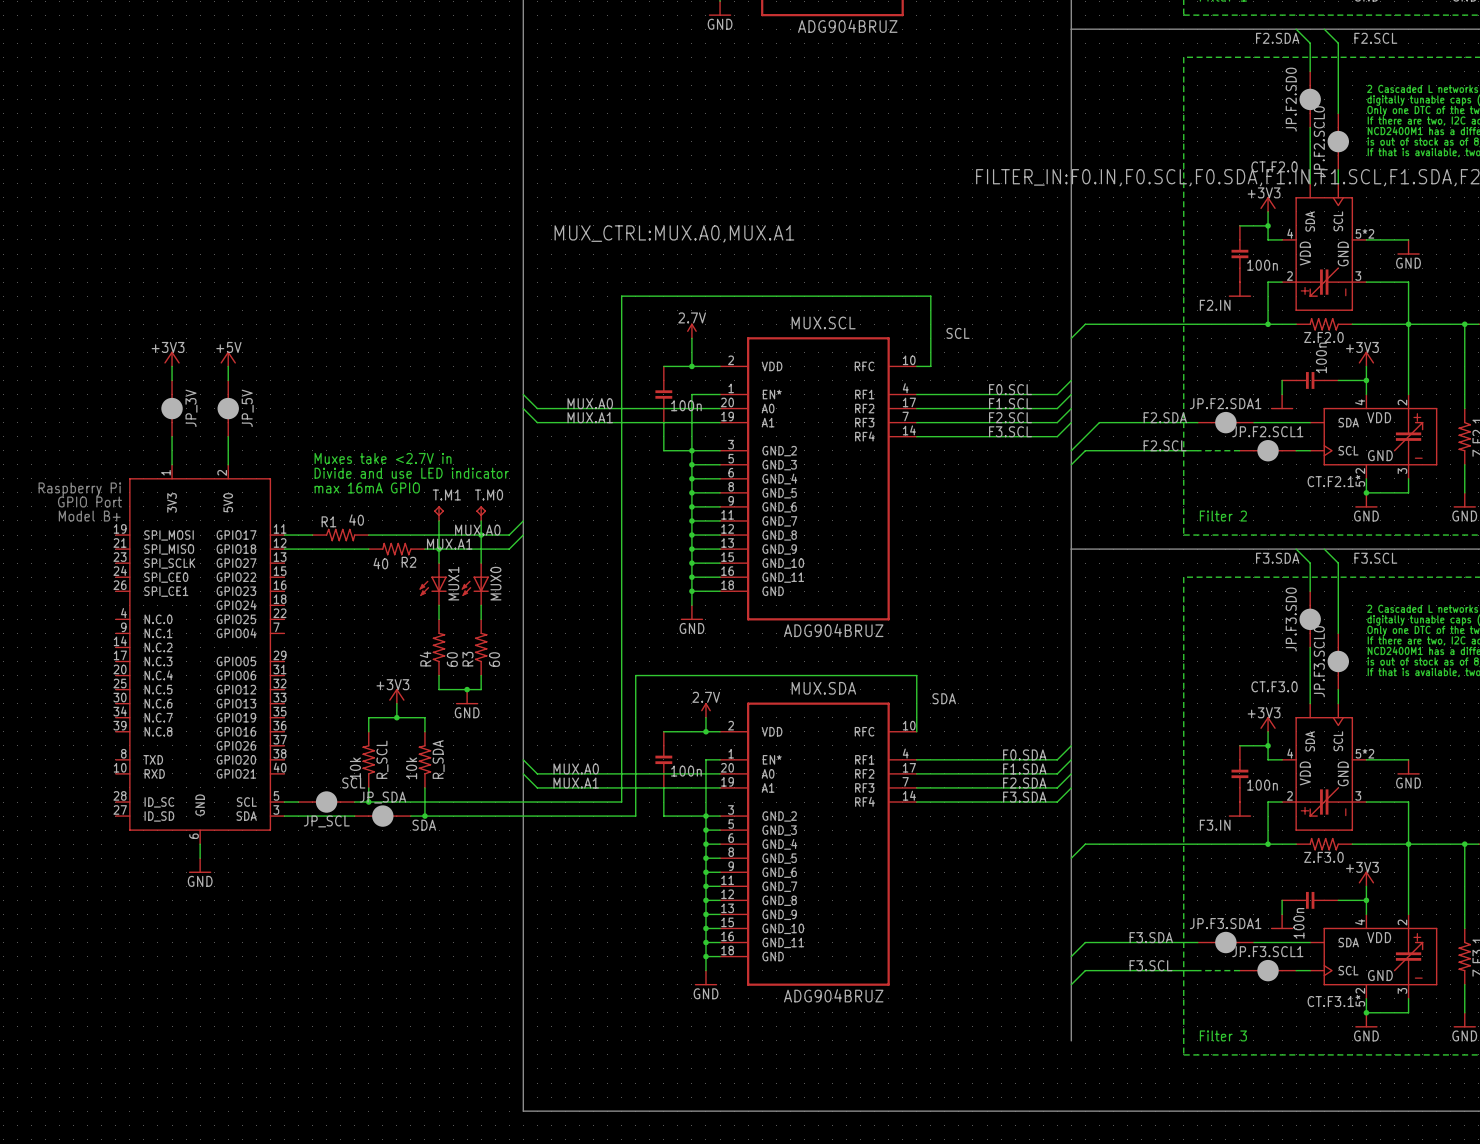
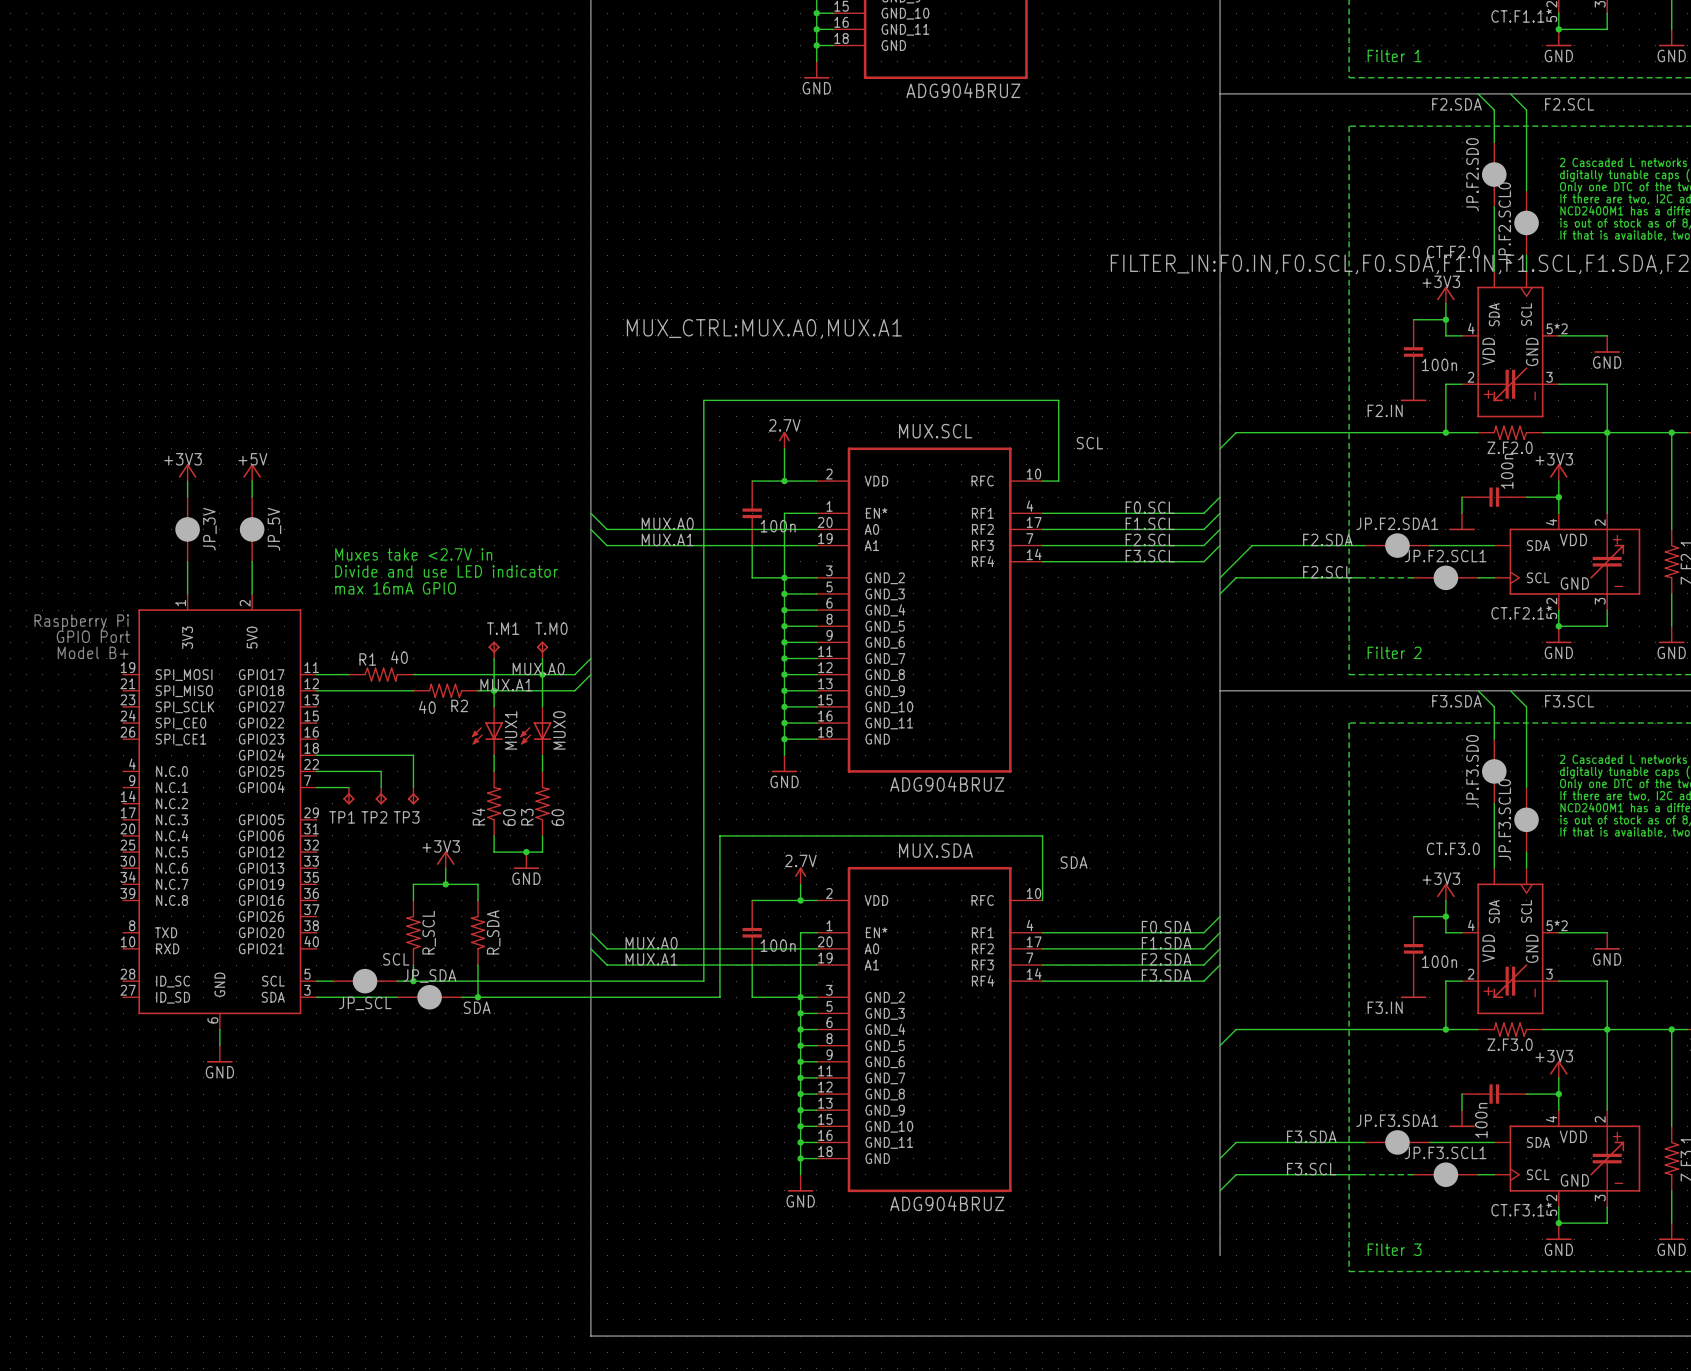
text position: Muxes take <2.7V in (383, 458) -> Muxes take <2.7V in (413, 554)
text position: Divide and use LED indicator (411, 473) -> Divide and use LED indicator (446, 571)
text position: max 16mA GPIO (367, 487) -> max 16mA GPIO (395, 588)
wire: none -> (316, 755) (413, 755) (413, 787)
wire: none -> (316, 771) (381, 771) (381, 787)
wire: none -> (316, 787) (348, 787)
TP1: none -> (348, 796)
TP2: none -> (381, 796)
TP3: none -> (413, 796)
R_SCL value: 10k (355, 768) -> none
R_SDA value: 10k (411, 768) -> none

